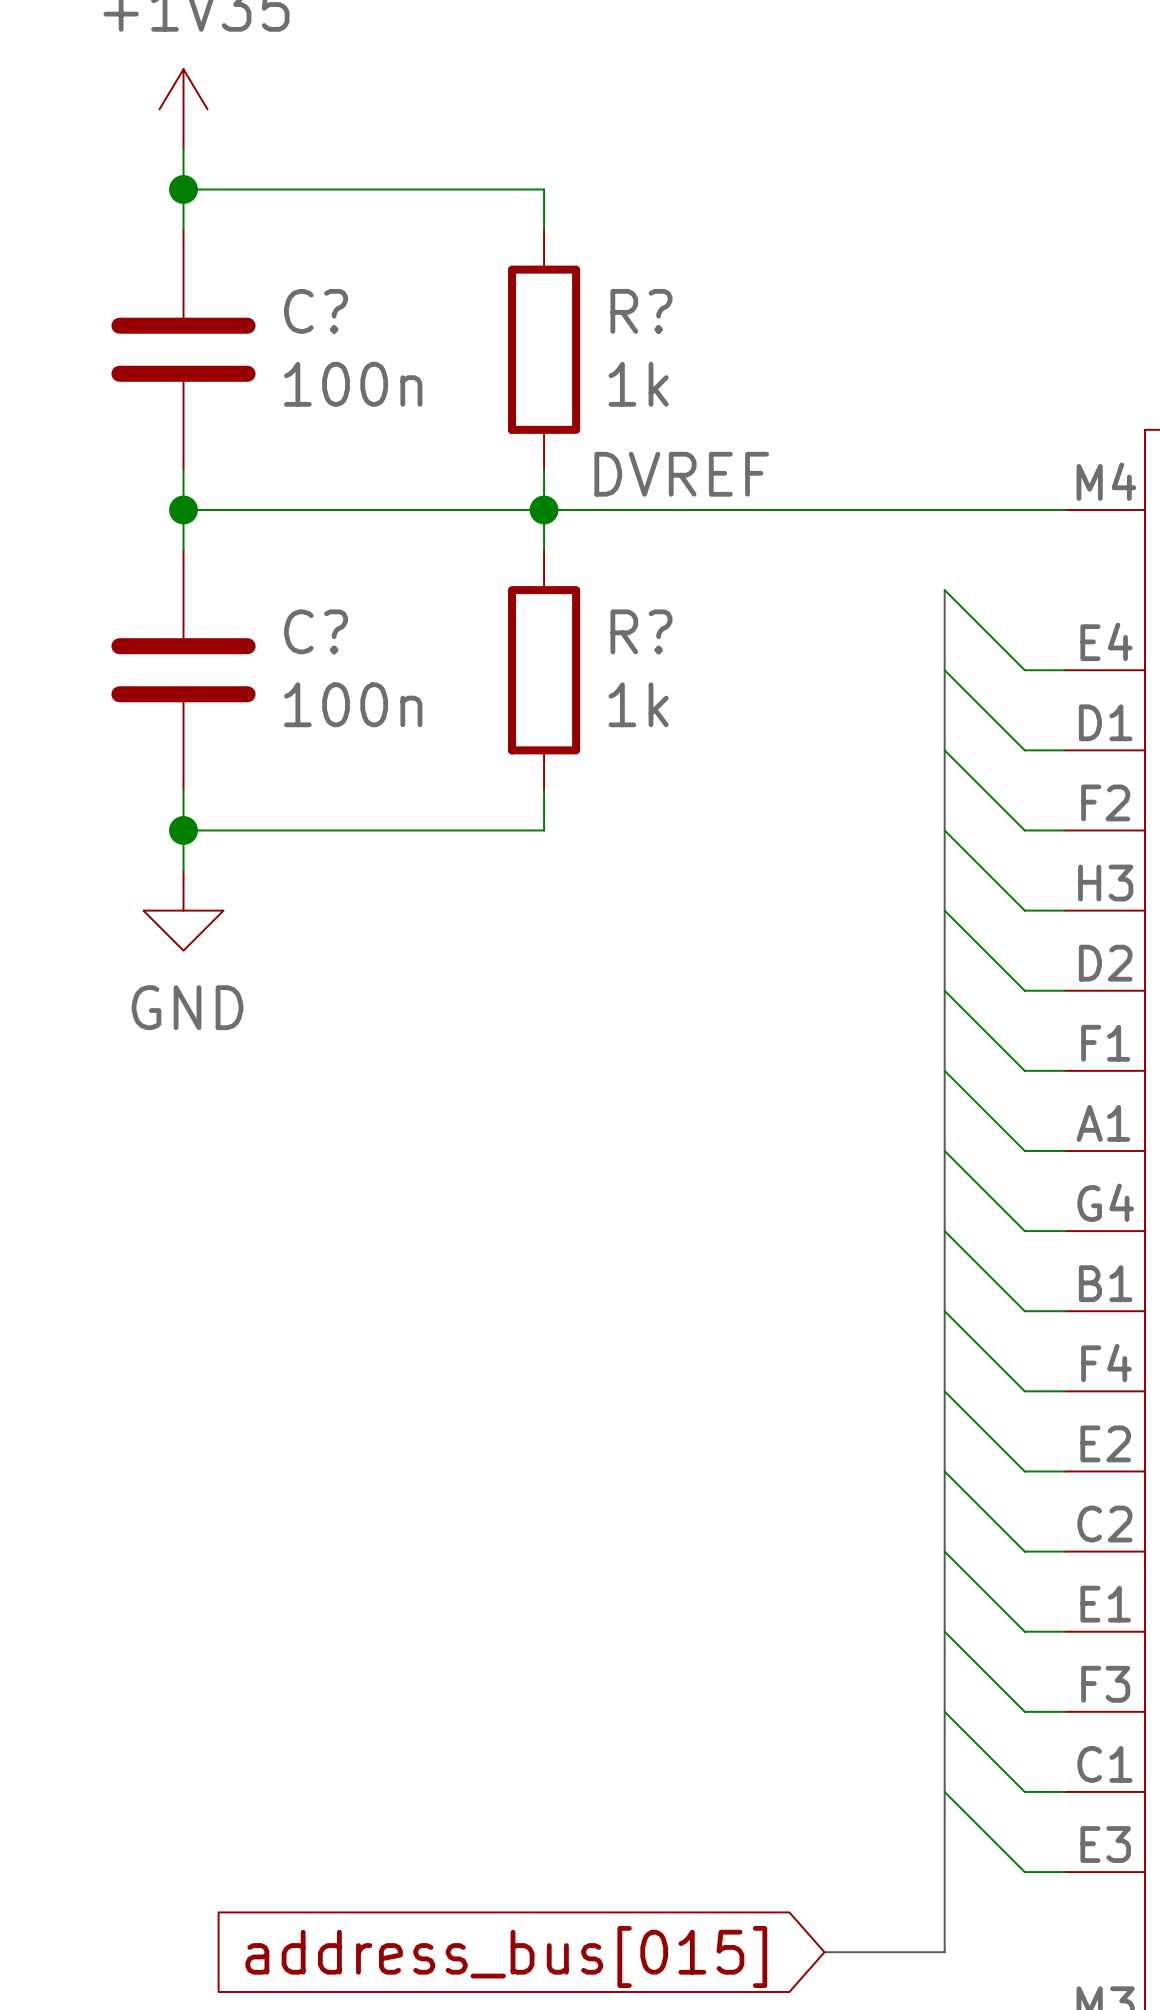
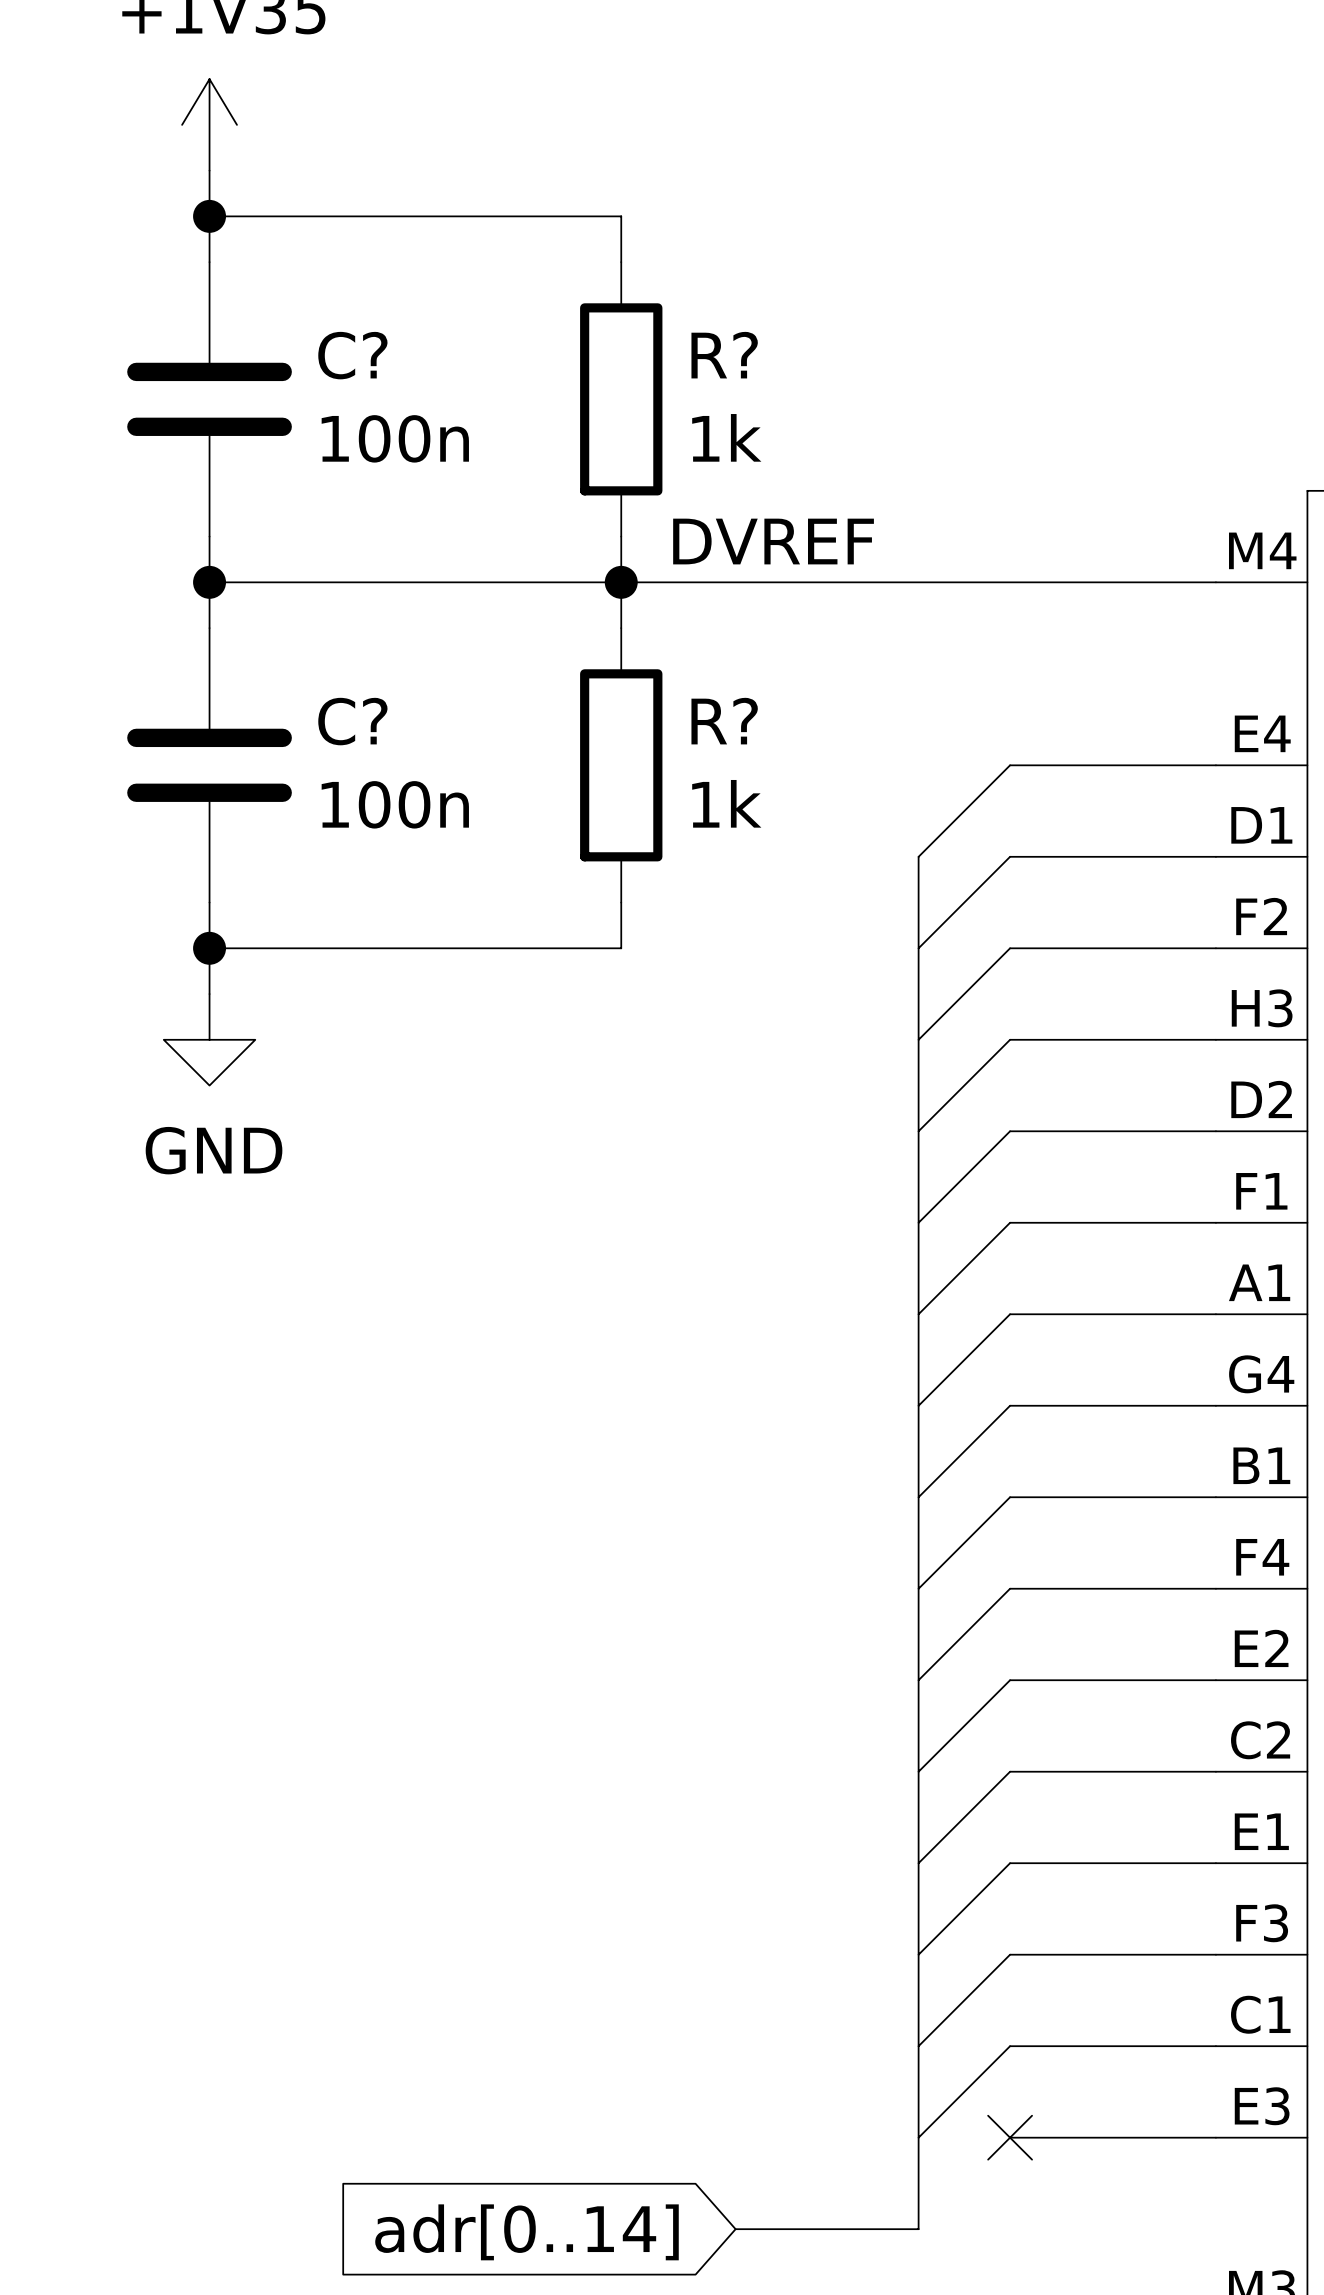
wire: (944, 590) (1024, 670) -> (1010, 765) (1170, 765)
bus: (944, 590) (944, 1952) (824, 1952) -> none
bus: none -> (1010, 765) (918, 856) (918, 2229) (735, 2229)
wire: (944, 670) (1024, 750) -> (1010, 856) (1170, 856)
bus: none -> (1010, 856) (918, 948)
wire: (944, 750) (1024, 830) -> (1010, 948) (1170, 948)
bus: none -> (1010, 948) (918, 1039)
wire: (944, 830) (1024, 910) -> (1010, 1039) (1170, 1039)
bus: none -> (1010, 1039) (918, 1131)
wire: (944, 910) (1024, 990) -> (1010, 1131) (1170, 1131)
bus: none -> (1010, 1131) (918, 1222)
wire: (944, 990) (1024, 1070) -> (1010, 1222) (1170, 1222)
bus: none -> (1010, 1222) (918, 1314)
wire: (944, 1070) (1024, 1150) -> (1010, 1314) (1170, 1314)
bus: none -> (1010, 1314) (918, 1405)
wire: (944, 1150) (1024, 1231) -> (1010, 1405) (1170, 1405)
bus: none -> (1010, 1405) (918, 1497)
wire: (944, 1231) (1024, 1311) -> (1010, 1497) (1170, 1497)
bus: none -> (1010, 1497) (918, 1588)
wire: (944, 1311) (1024, 1391) -> (1010, 1588) (1170, 1588)
bus: none -> (1010, 1588) (918, 1680)
wire: (944, 1391) (1024, 1471) -> (1010, 1680) (1170, 1680)
bus: none -> (1010, 1680) (918, 1771)
wire: (944, 1471) (1024, 1551) -> (1010, 1771) (1170, 1771)
bus: none -> (1010, 1771) (918, 1863)
wire: (944, 1551) (1024, 1631) -> (1010, 1863) (1170, 1863)
bus: none -> (1010, 1863) (918, 1954)
wire: (944, 1631) (1024, 1711) -> (1010, 1954) (1170, 1954)
bus: none -> (1010, 1954) (918, 2046)
wire: (944, 1711) (1024, 1791) -> (1010, 2046) (1170, 2046)
bus: none -> (1010, 2046) (918, 2137)
wire: (944, 1791) (1024, 1872) -> (1010, 2137) (1170, 2137)
no-connect mark: none -> (1010, 2137)
global label: none -> adr[0..14] (527, 2232)
global label: address_bus[015] (506, 1956) -> none

